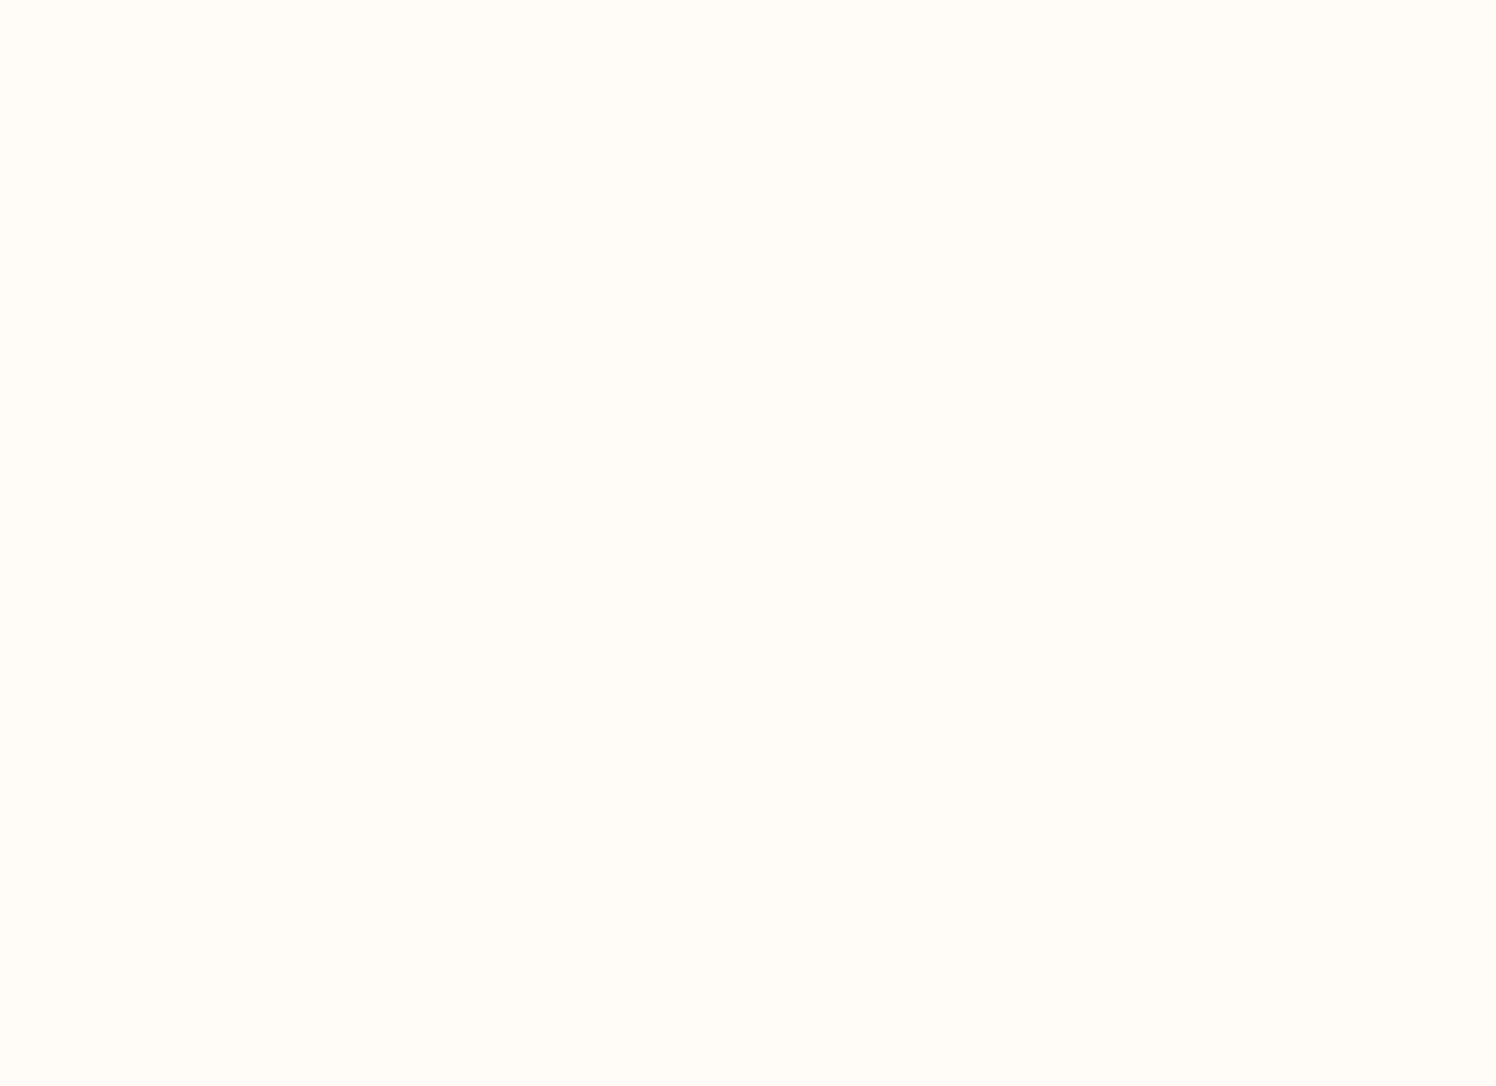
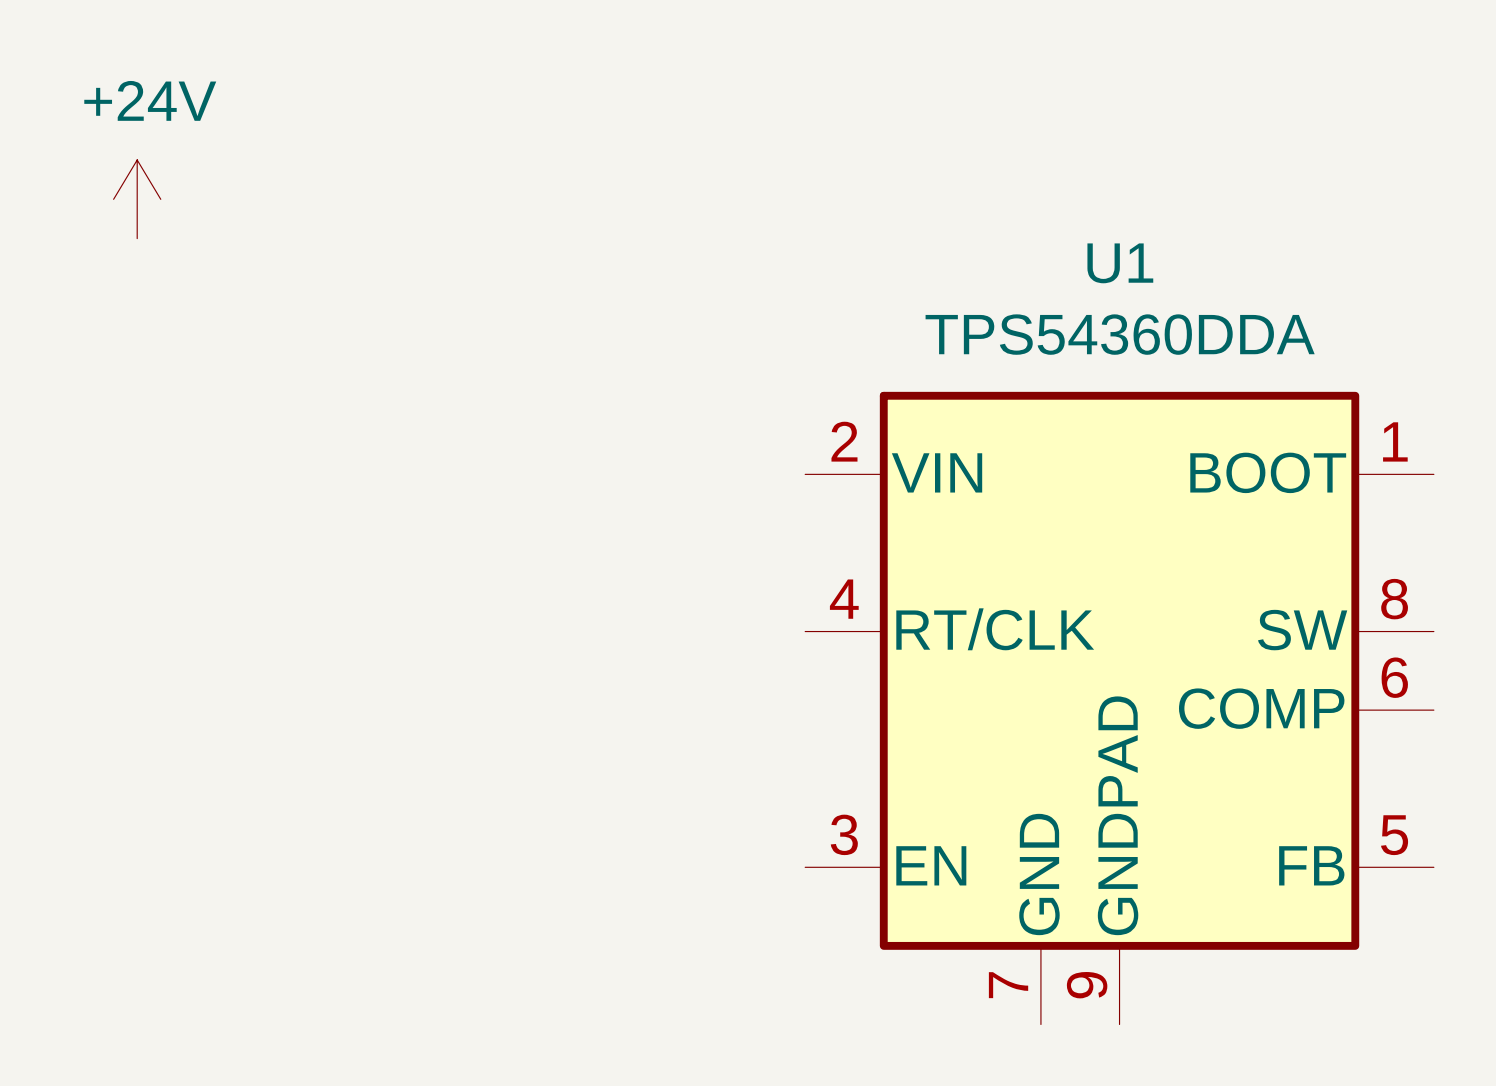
power symbol: none -> +24V (137, 199)
U1: none -> TPS54360DDA (1119, 708)

